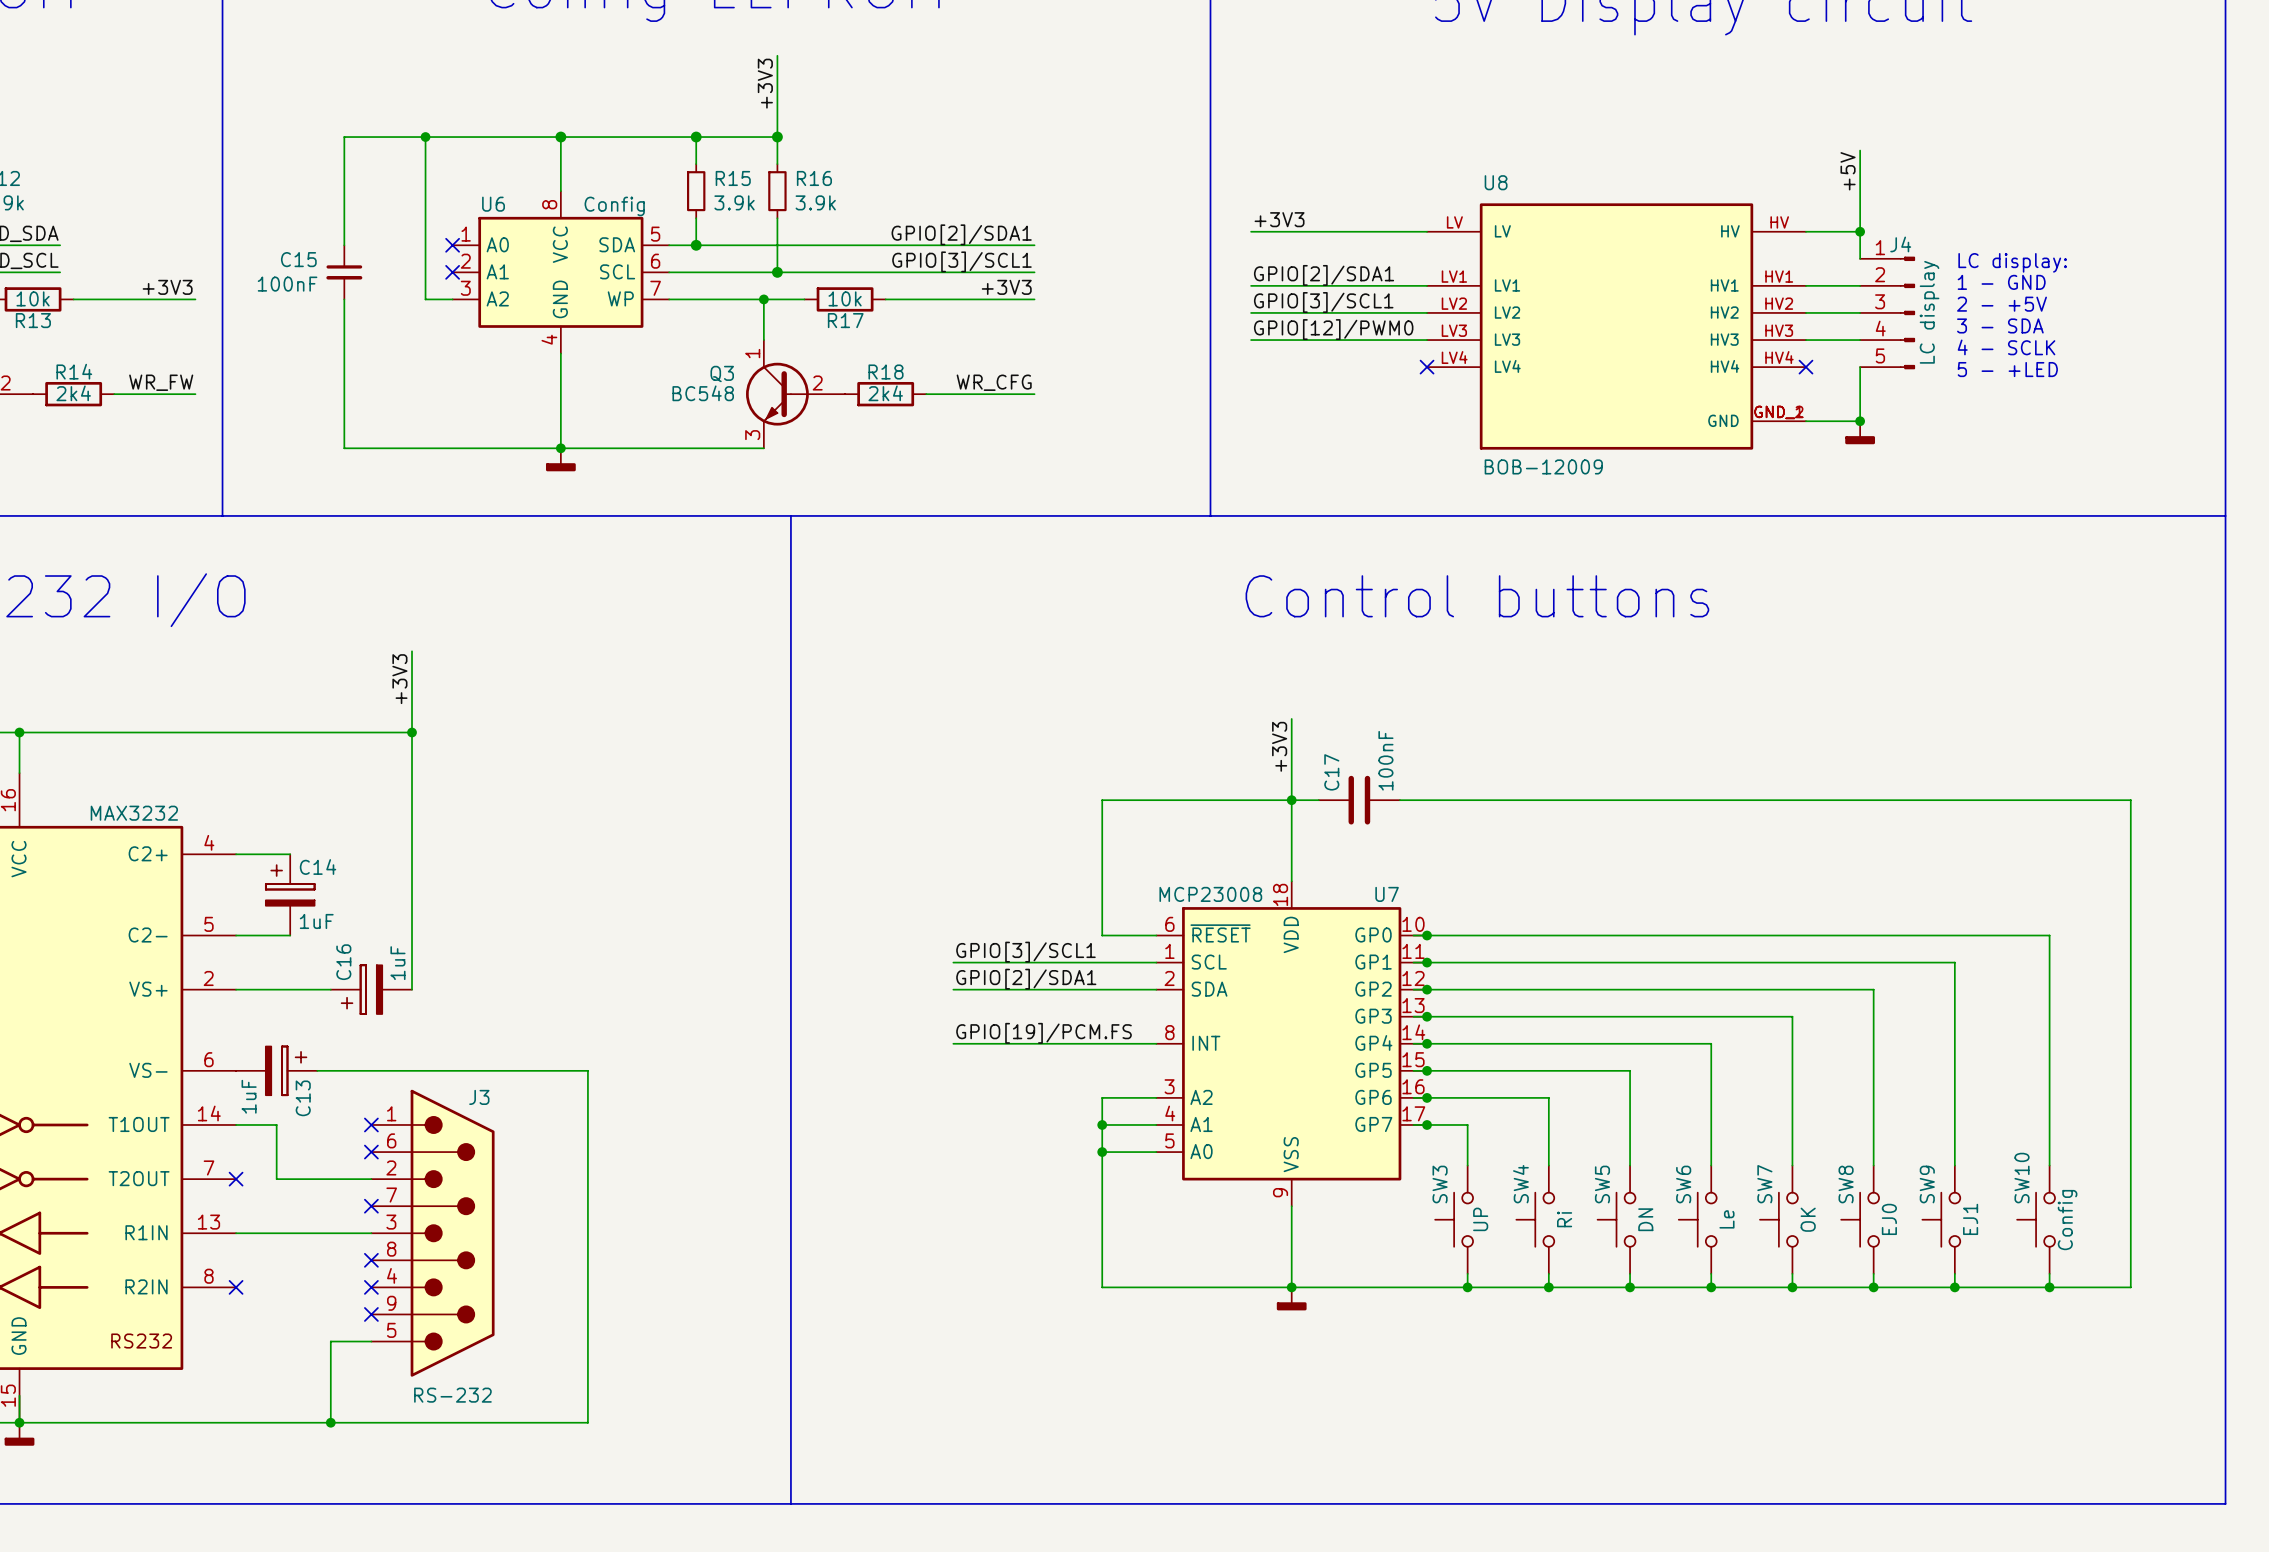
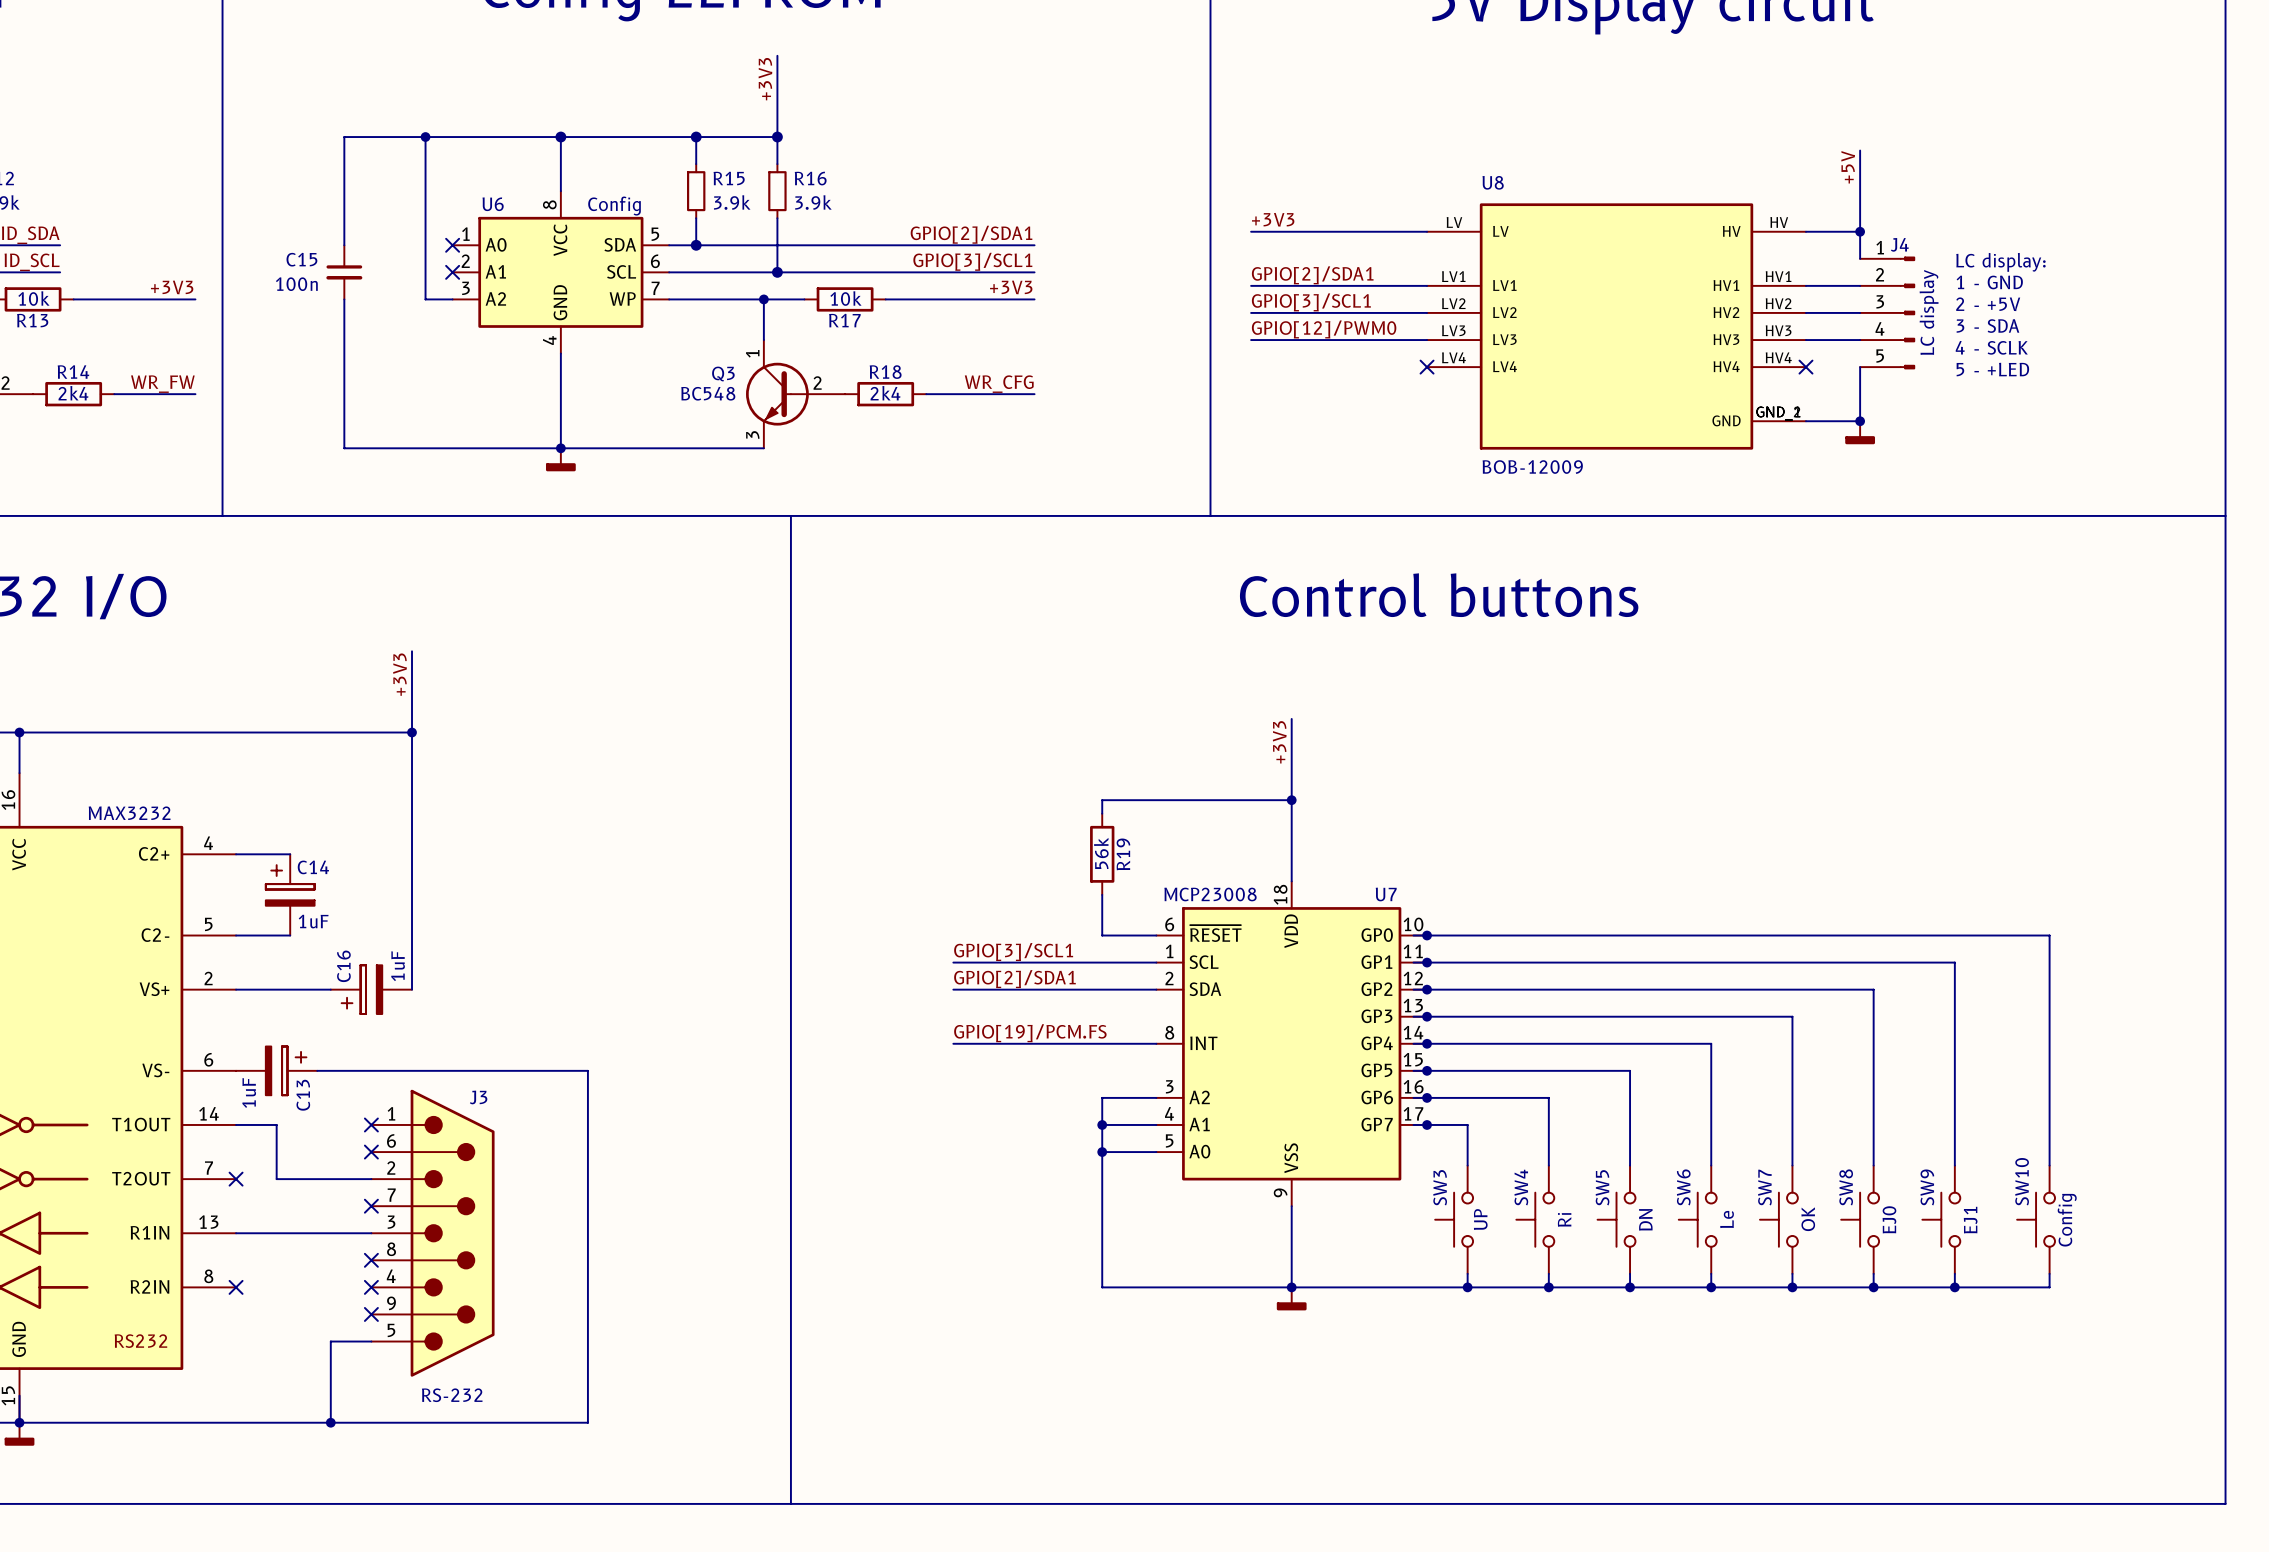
C15 value: 100nF (287, 284) -> 100n (296, 284)
wire: (1291, 800) (1318, 800) -> none
C17: 100nF (1359, 800) -> none
wire: (1399, 800) (2130, 800) (2130, 1287) (2049, 1287) -> none
wire: (1102, 813) (1102, 894) -> none
R19: none -> 56k (1102, 854)
junction: (2049, 1287) -> none

